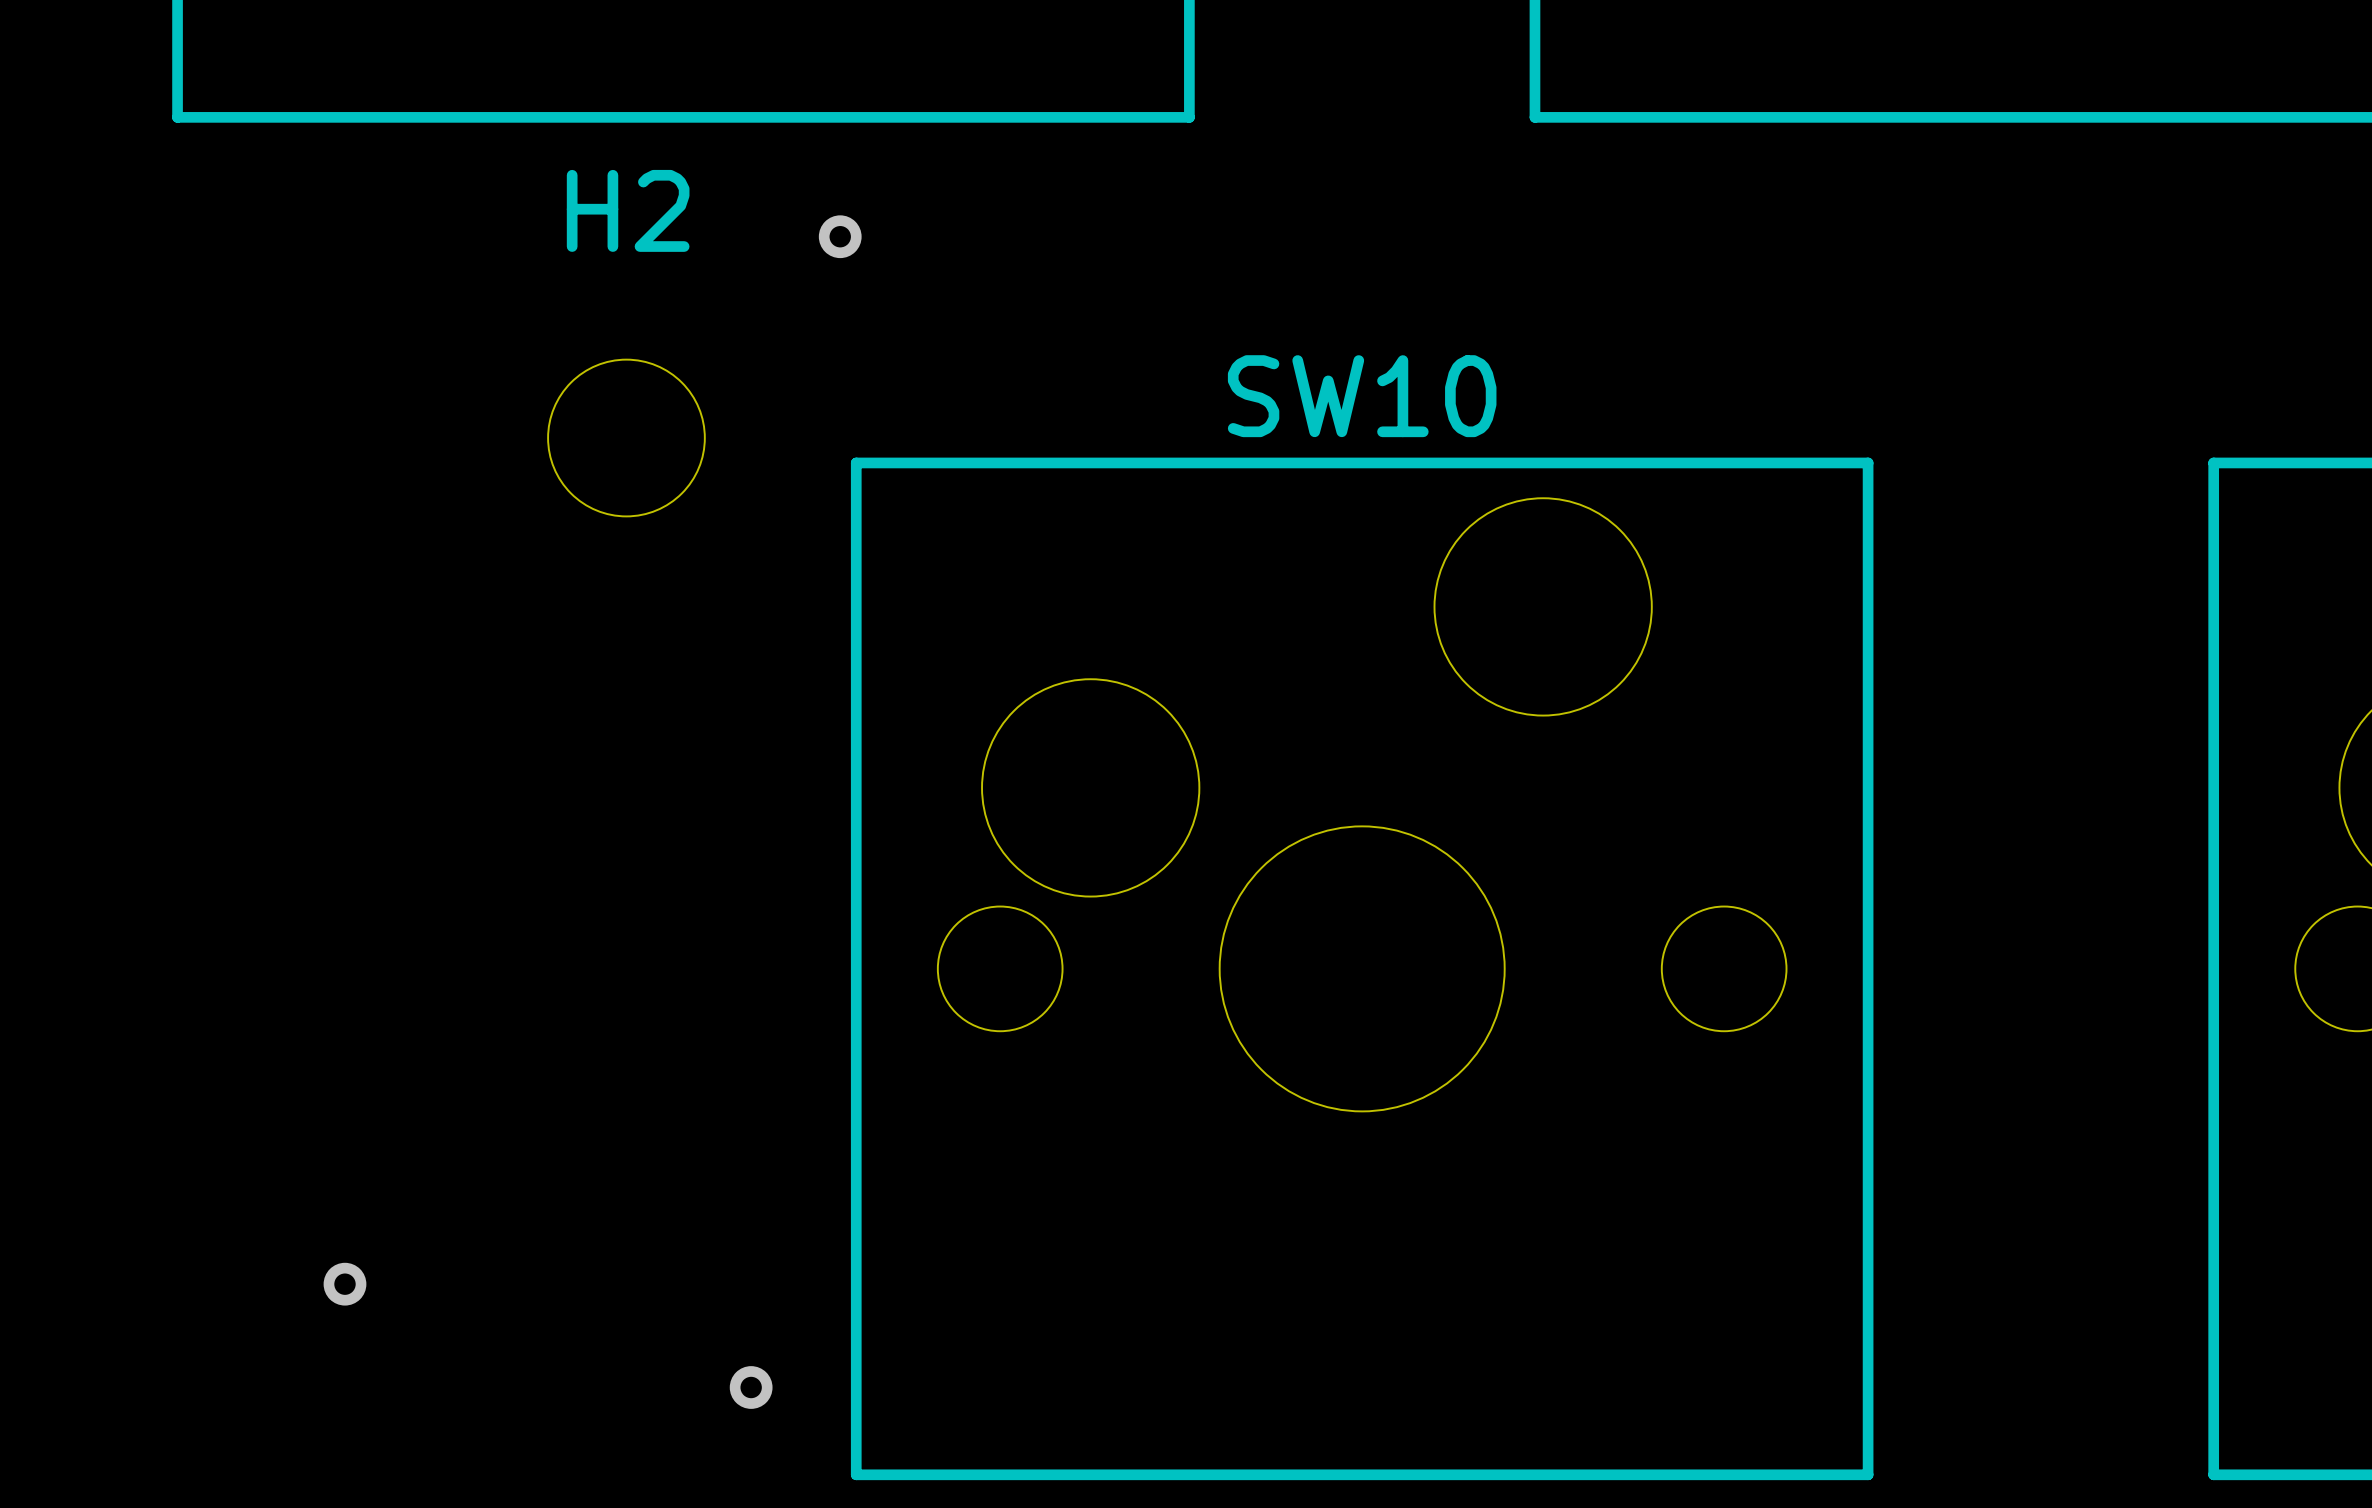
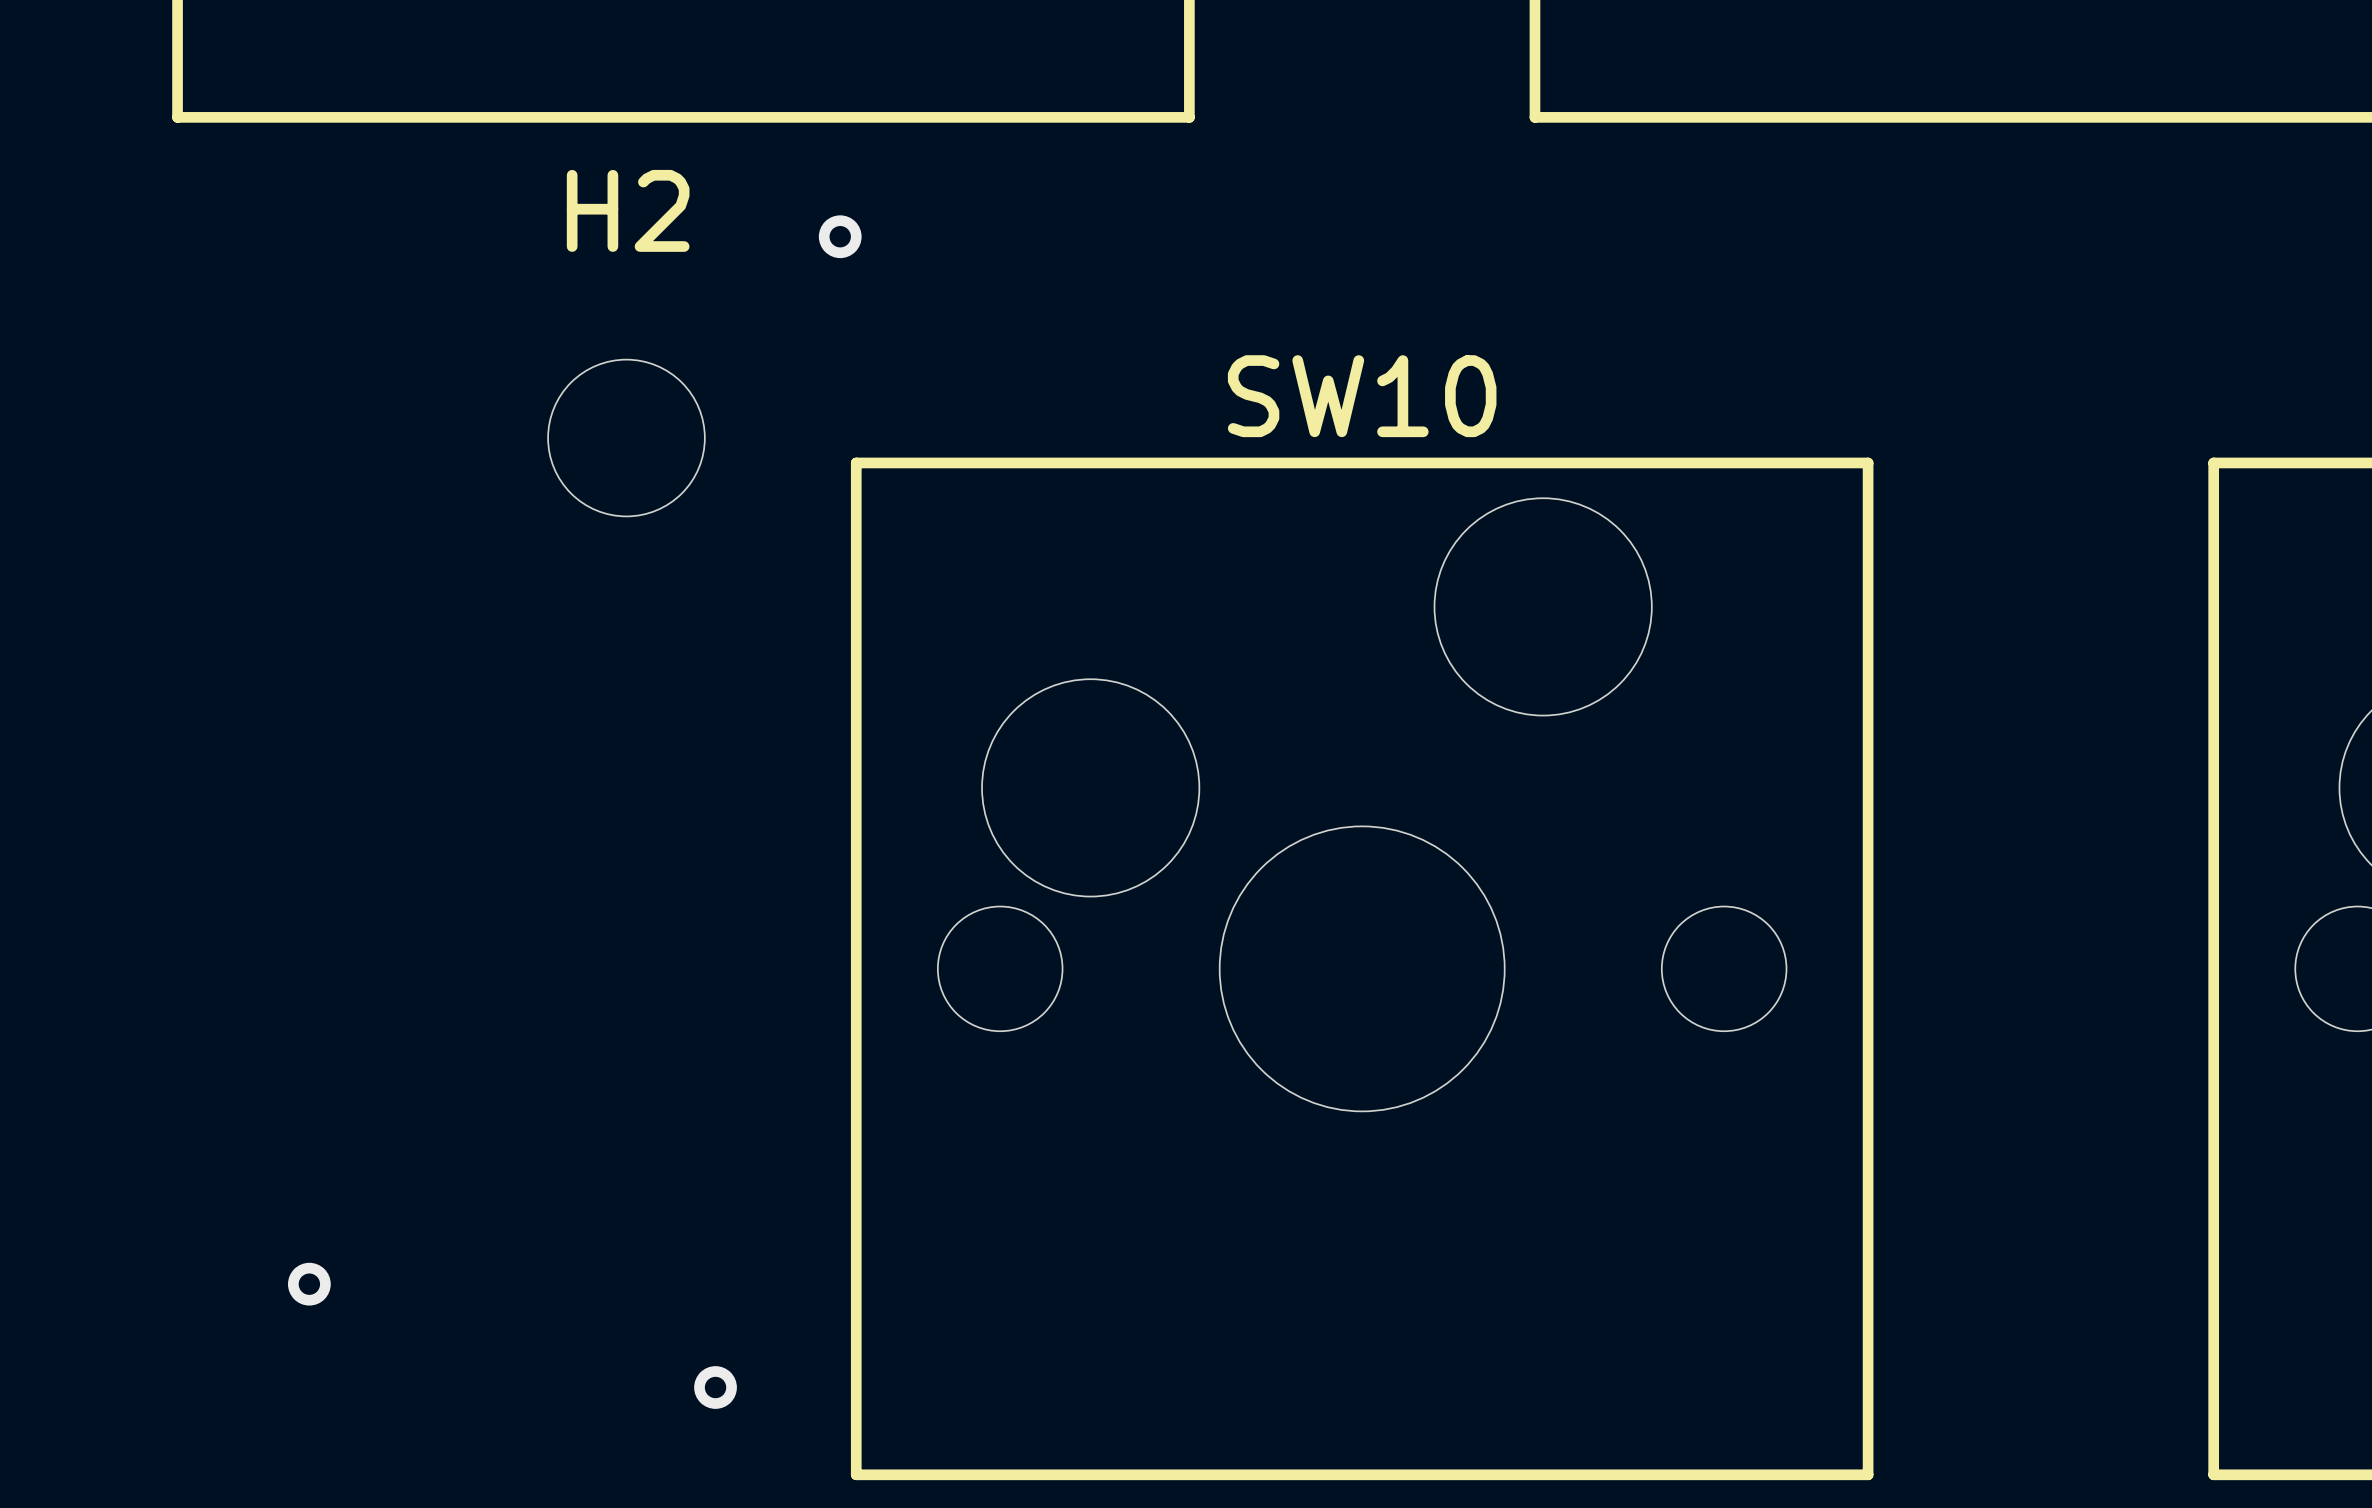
via position: (344, 1284) -> (309, 1284)
via position: (751, 1387) -> (715, 1387)

